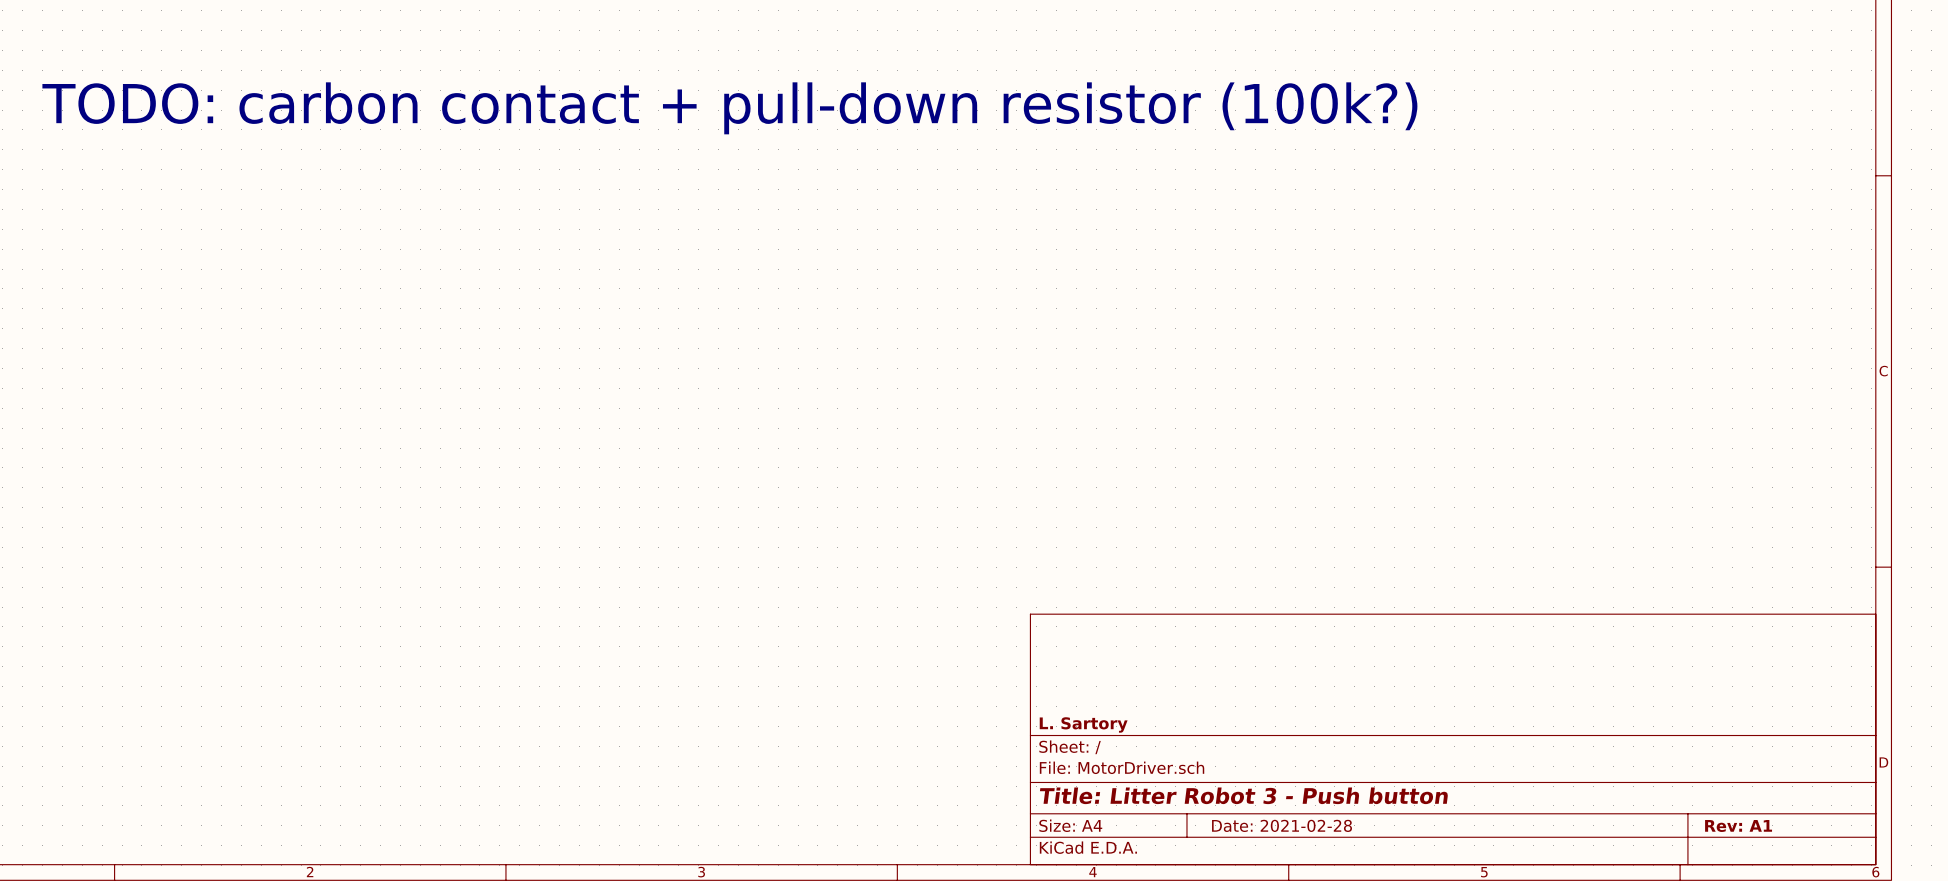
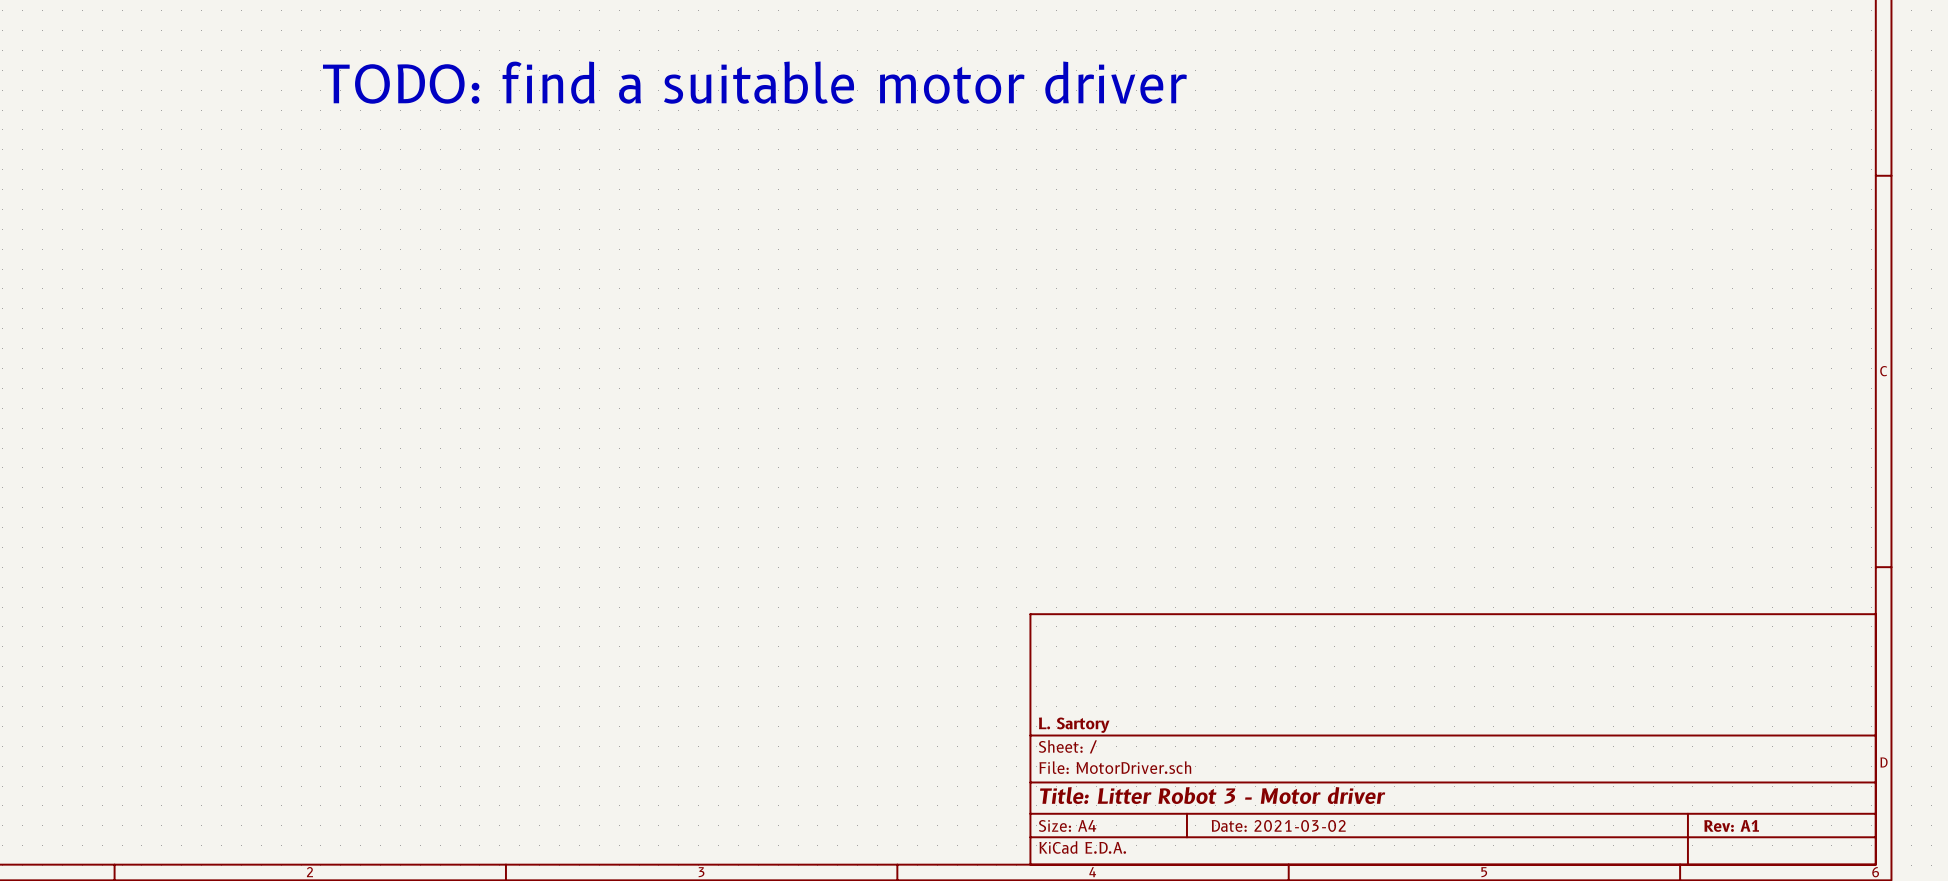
text: none -> TODO: find a suitable motor driver (754, 82)
text: TODO: carbon contact + pull-down resistor (100k?) (729, 108) -> none
title block: Title: Litter Robot 3 - Push button (1243, 795) -> Title: Litter Robot 3 - Motor driver (1212, 795)
title block: Date: 2021-02-28 (1282, 825) -> Date: 2021-03-02 (1278, 825)

